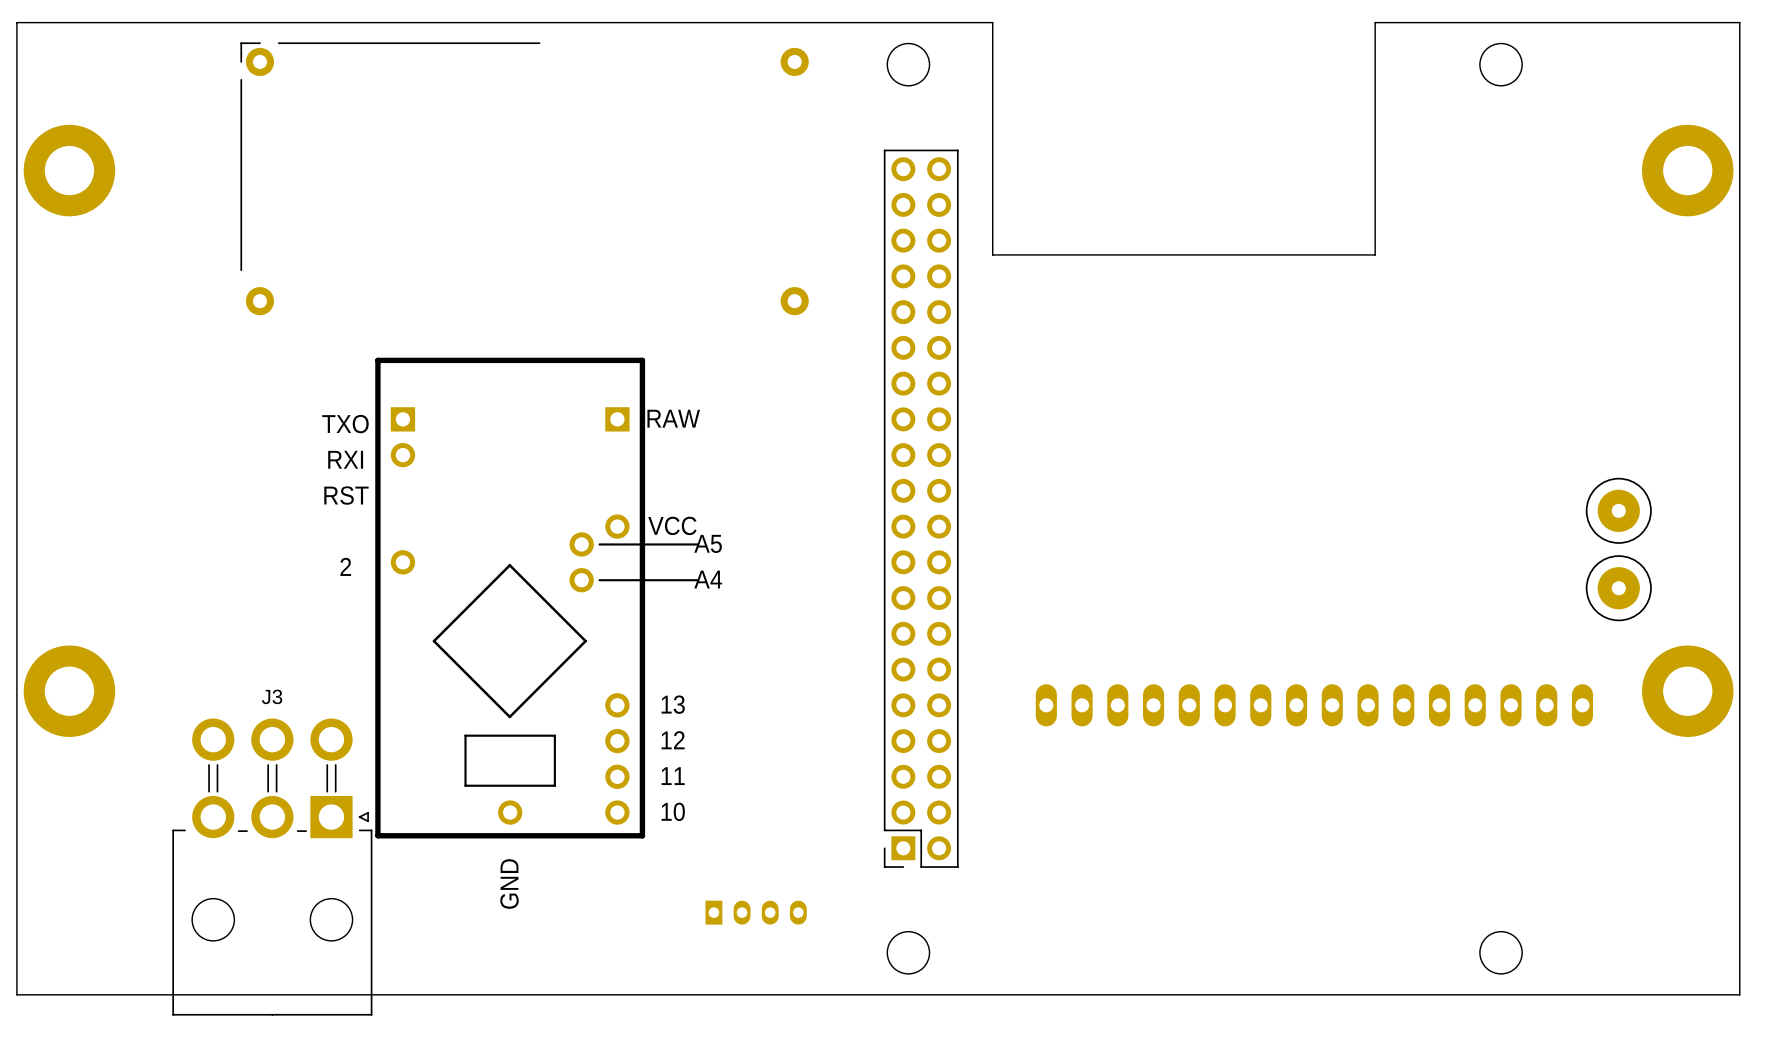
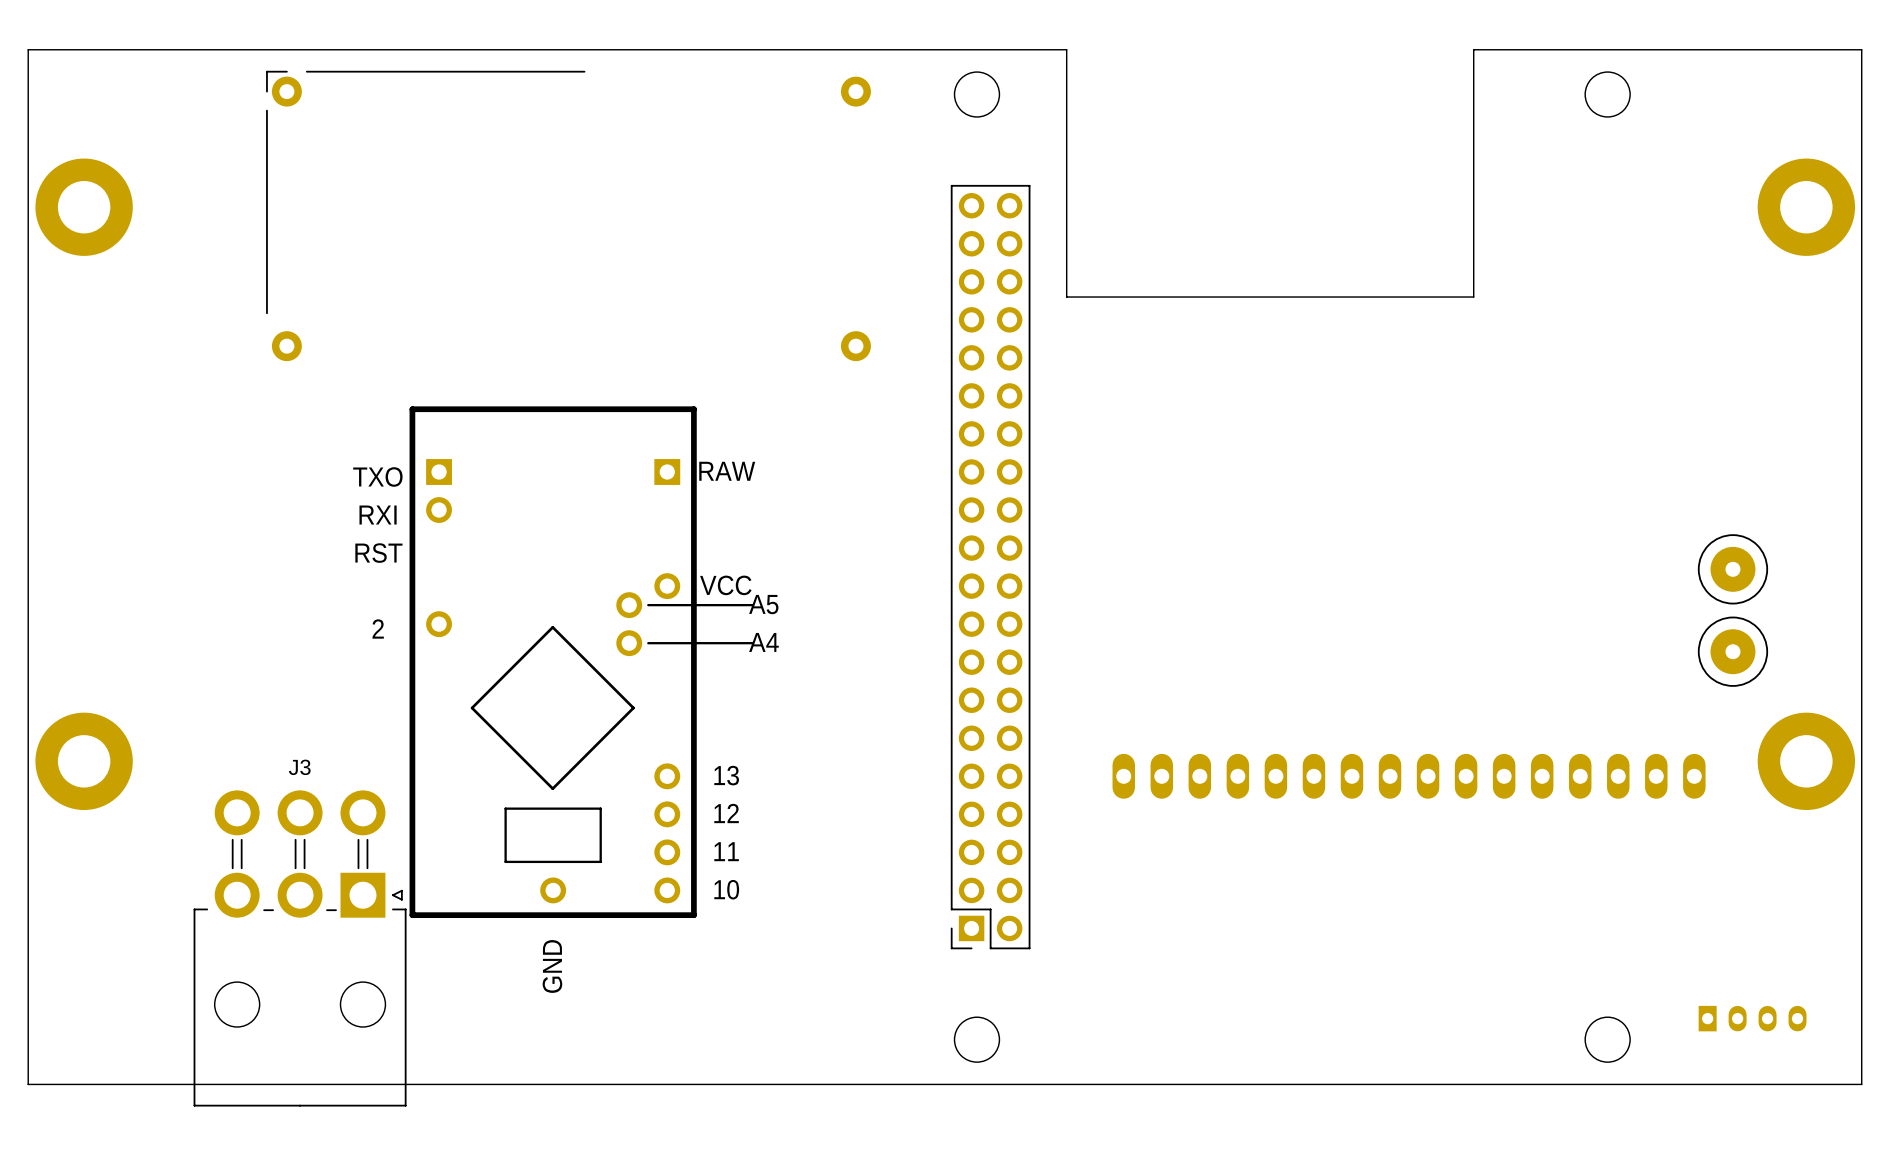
part: (756, 912) -> none
part: none -> (1752, 1018)

